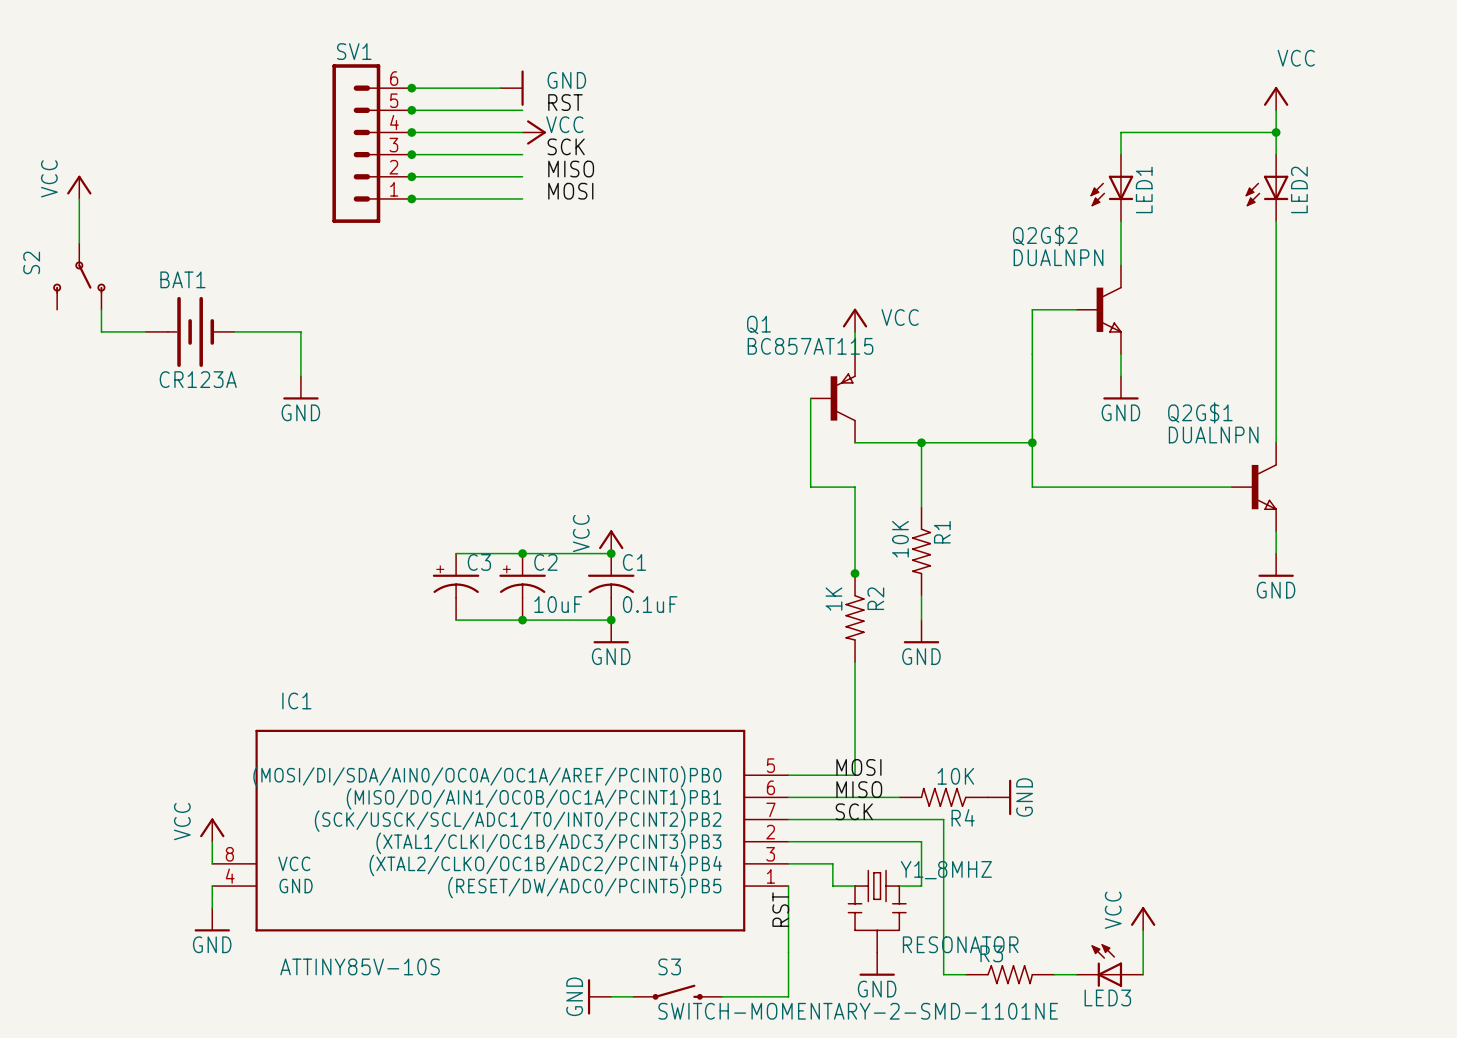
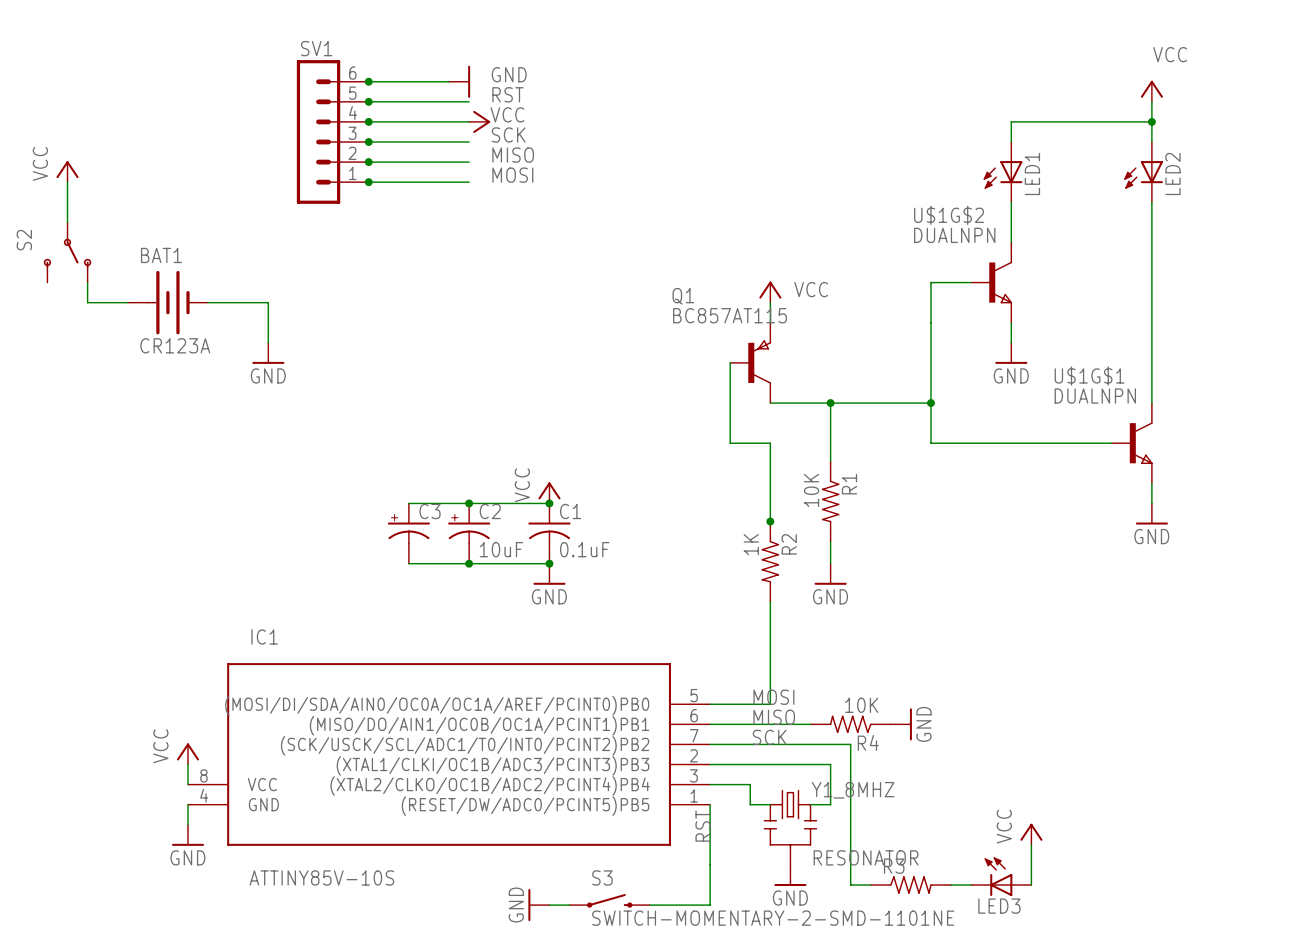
Q2G$2 name: Q2G$2 (1045, 235) -> U$1G$2 (949, 215)
Q2G$1 name: Q2G$1 (1200, 412) -> U$1G$1 (1089, 375)

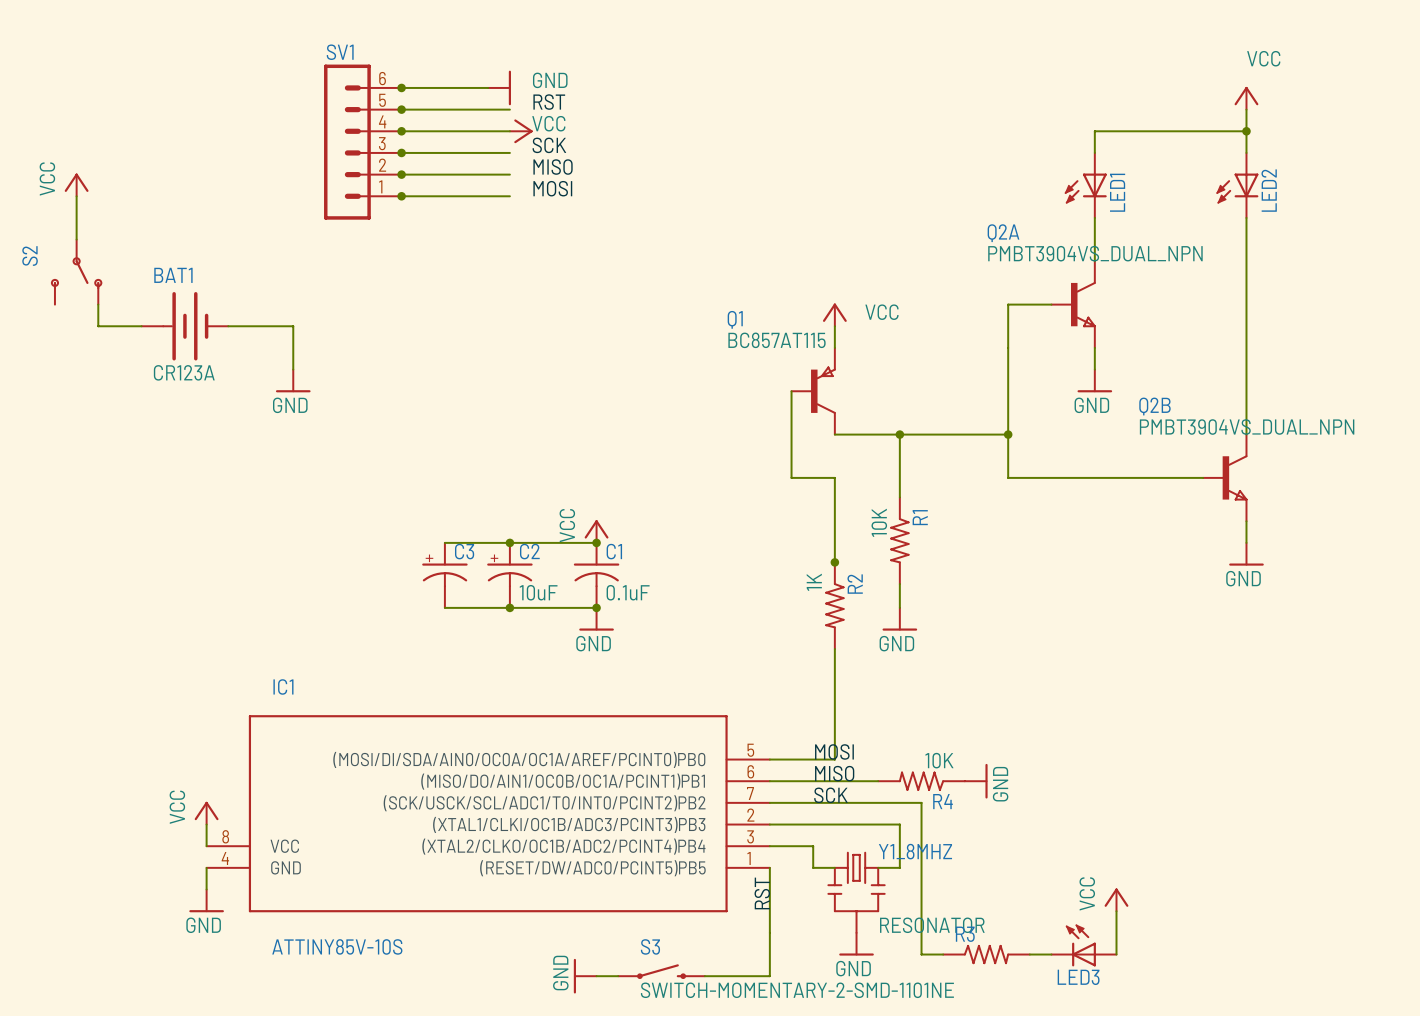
U$1G$2 name: U$1G$2 (949, 215) -> Q2A (1003, 233)
U$1G$2 value: DUALNPN (954, 235) -> PMBT3904VS_DUAL_NPN (1095, 253)
U$1G$1 name: U$1G$1 (1089, 375) -> Q2B (1154, 406)
U$1G$1 value: DUALNPN (1095, 396) -> PMBT3904VS_DUAL_NPN (1247, 427)

